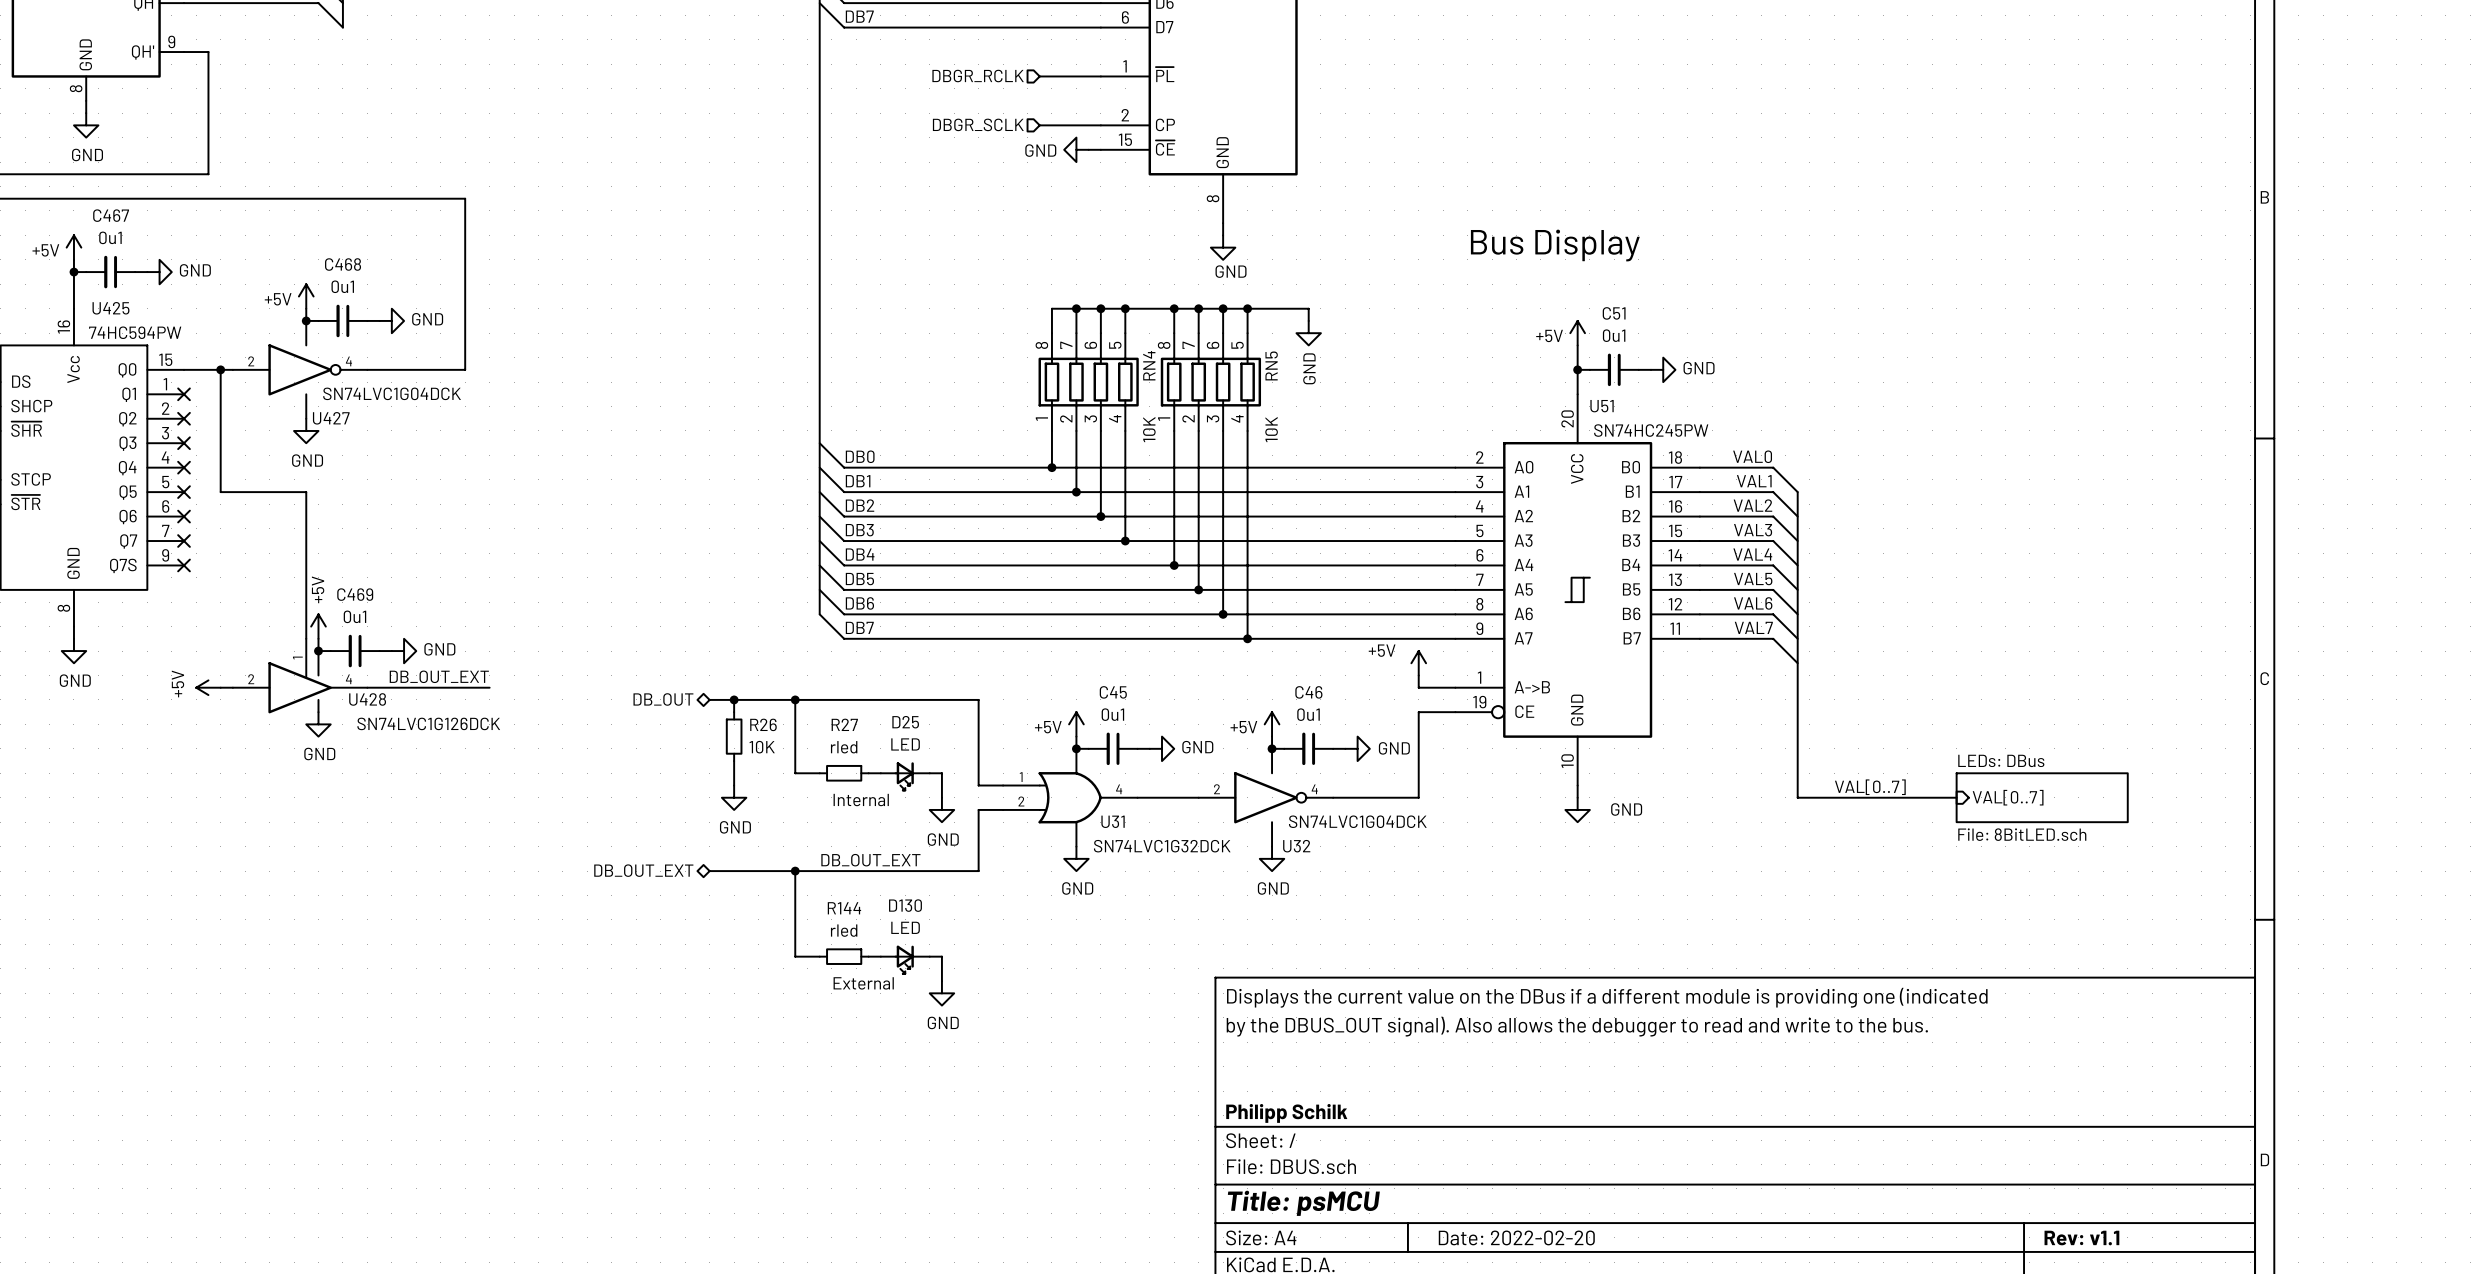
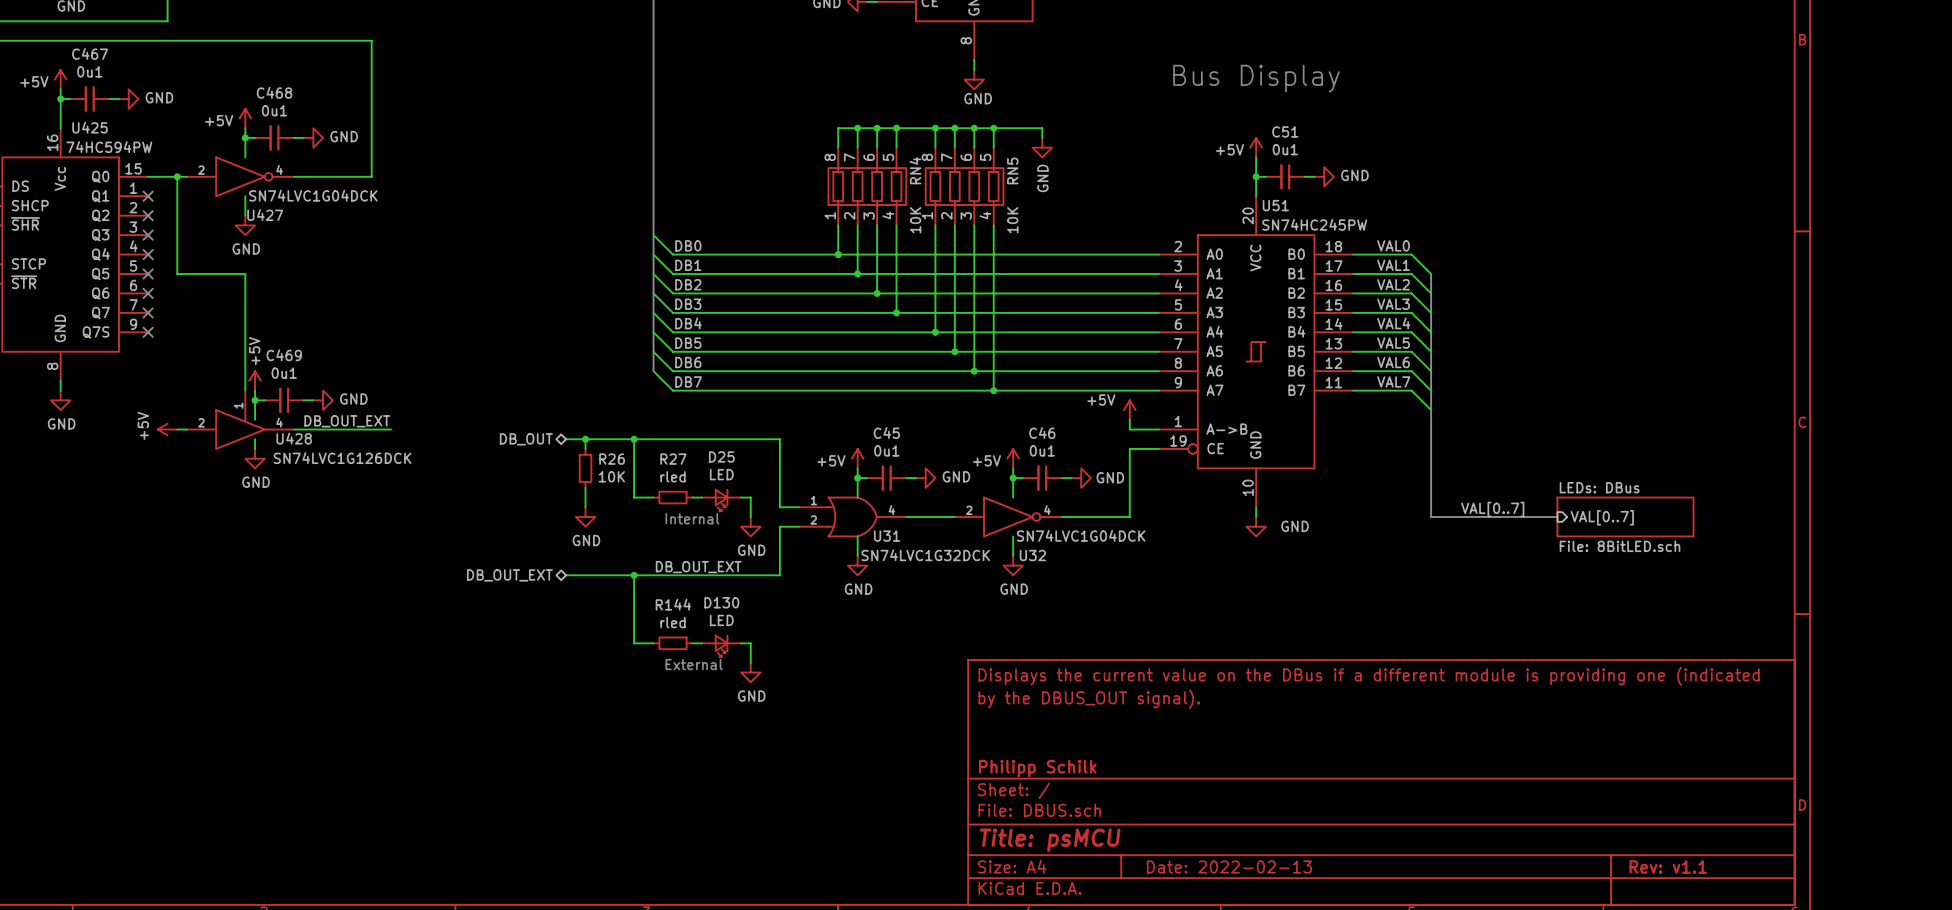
title block: by the DBUS_OUT signal). Also allows the debugger to read and write to the bus. (1577, 1026) -> by the DBUS_OUT signal). (1089, 699)
title block: Date: 2022-02-20 (1516, 1237) -> Date: 2022-02-13 (1229, 866)

